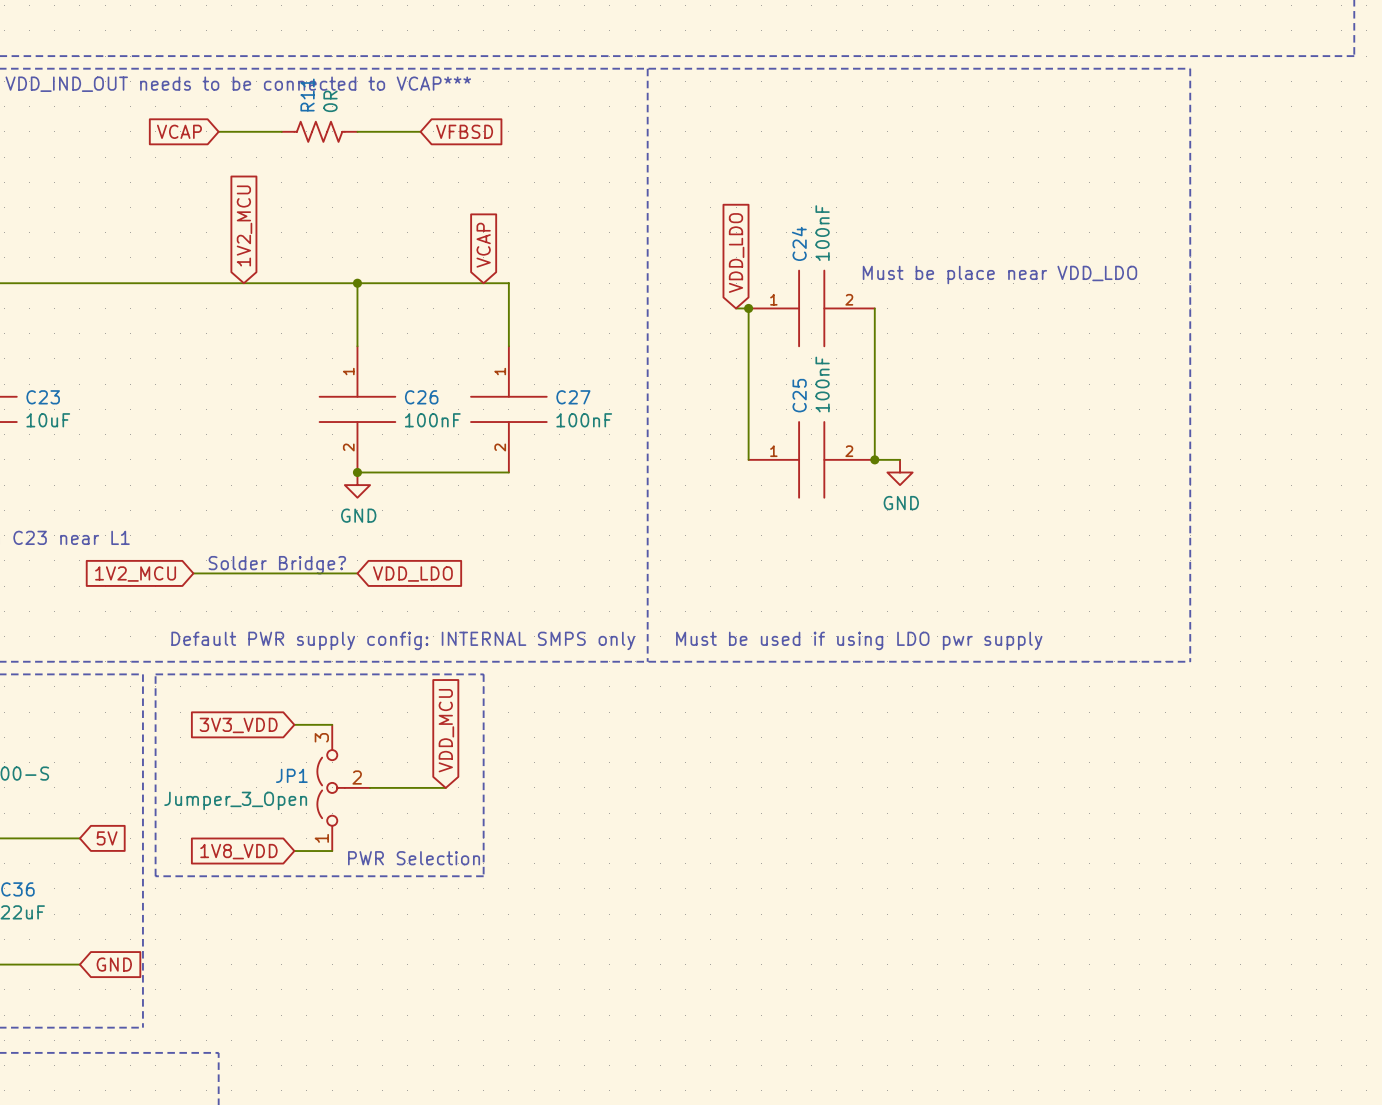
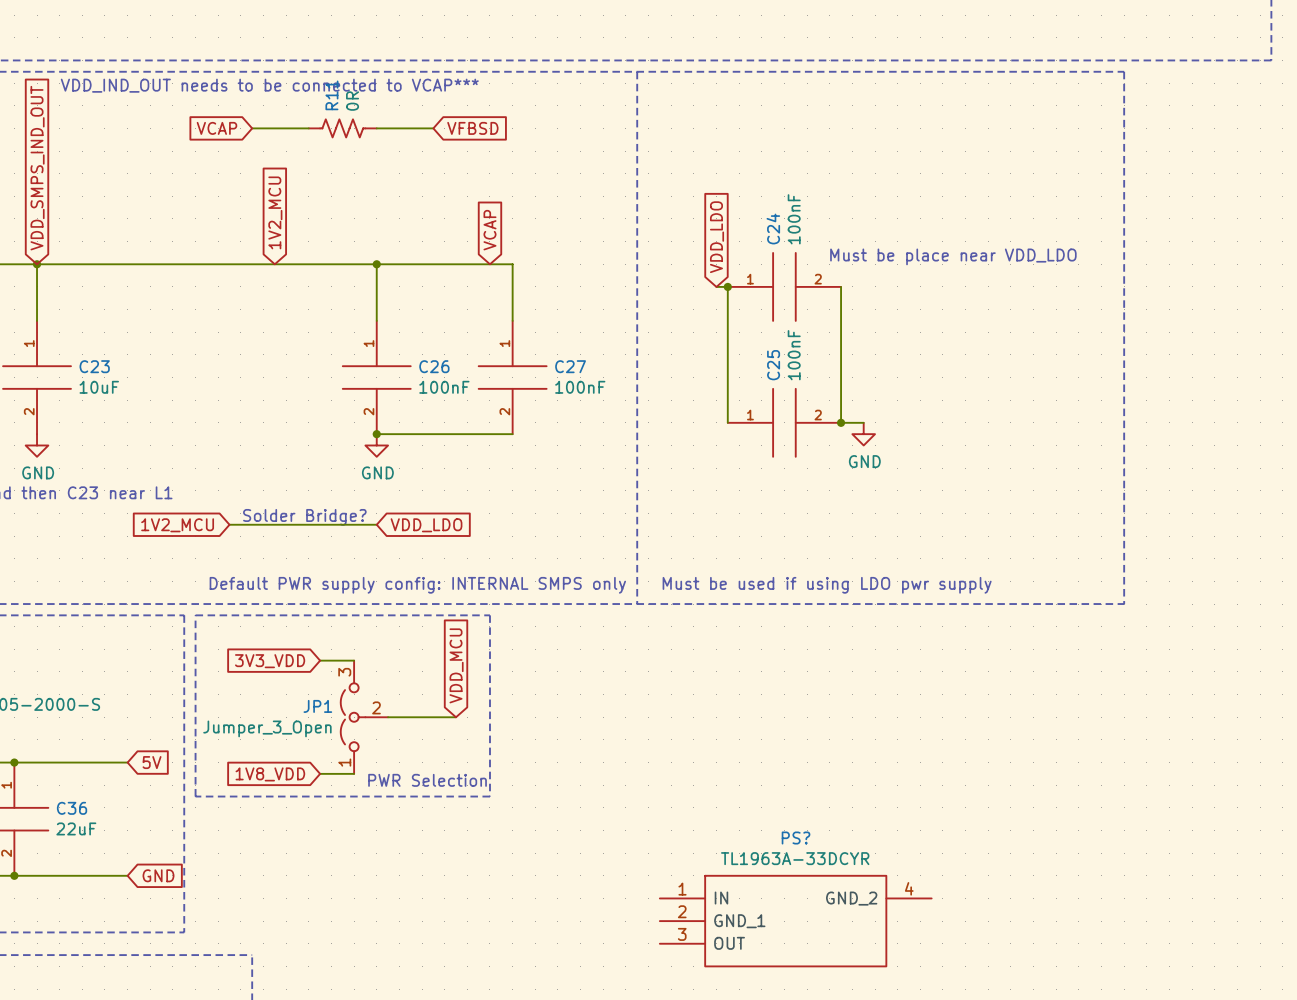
PS?: none -> TL1963A-33DCYR (795, 921)

